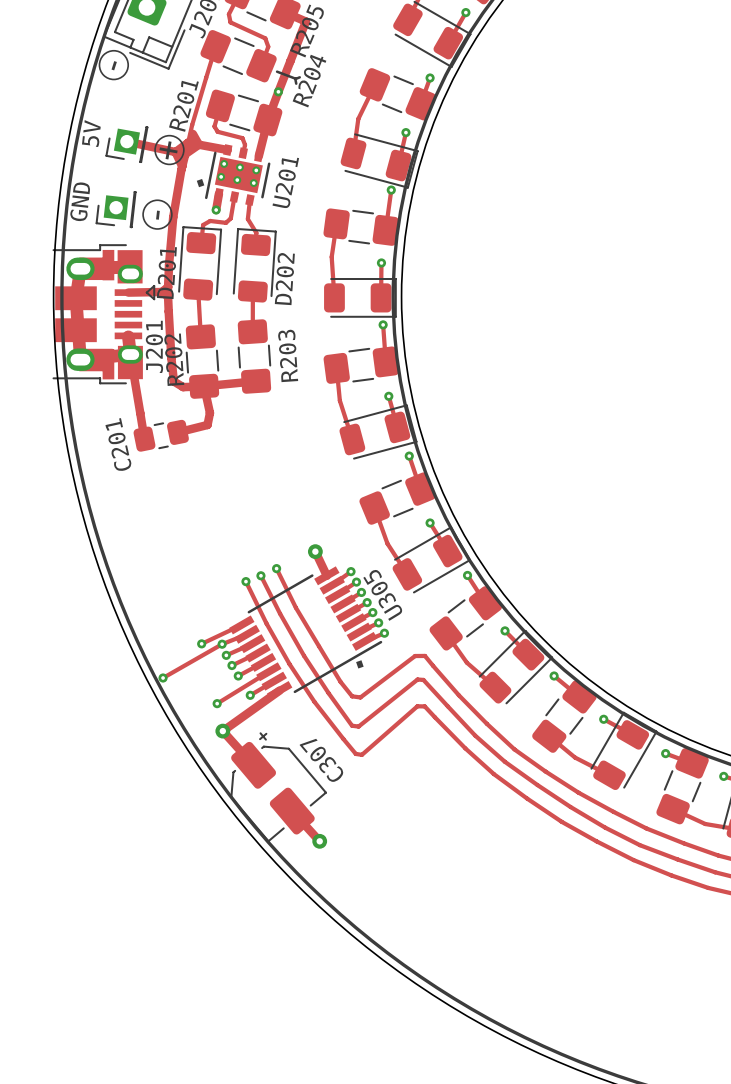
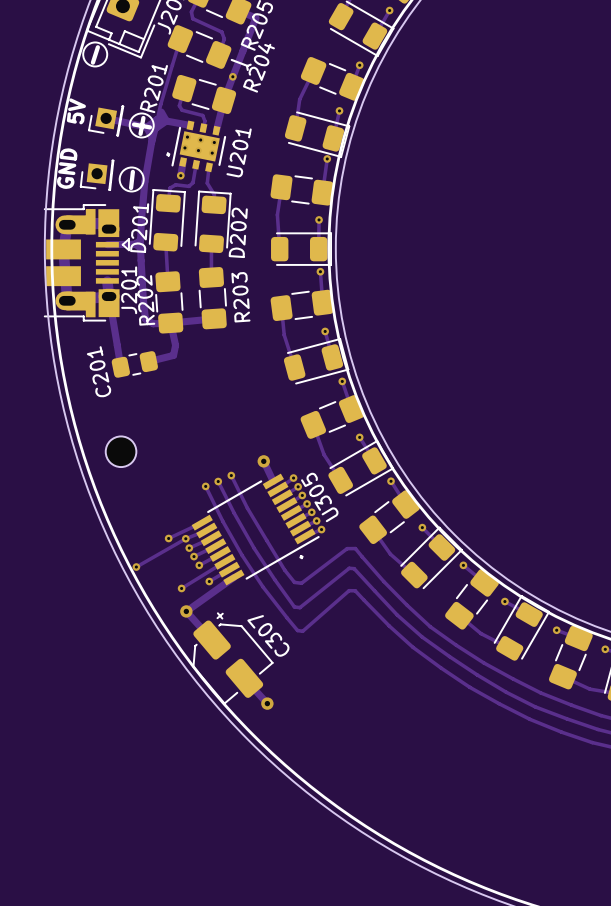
part: none -> (121, 451)

